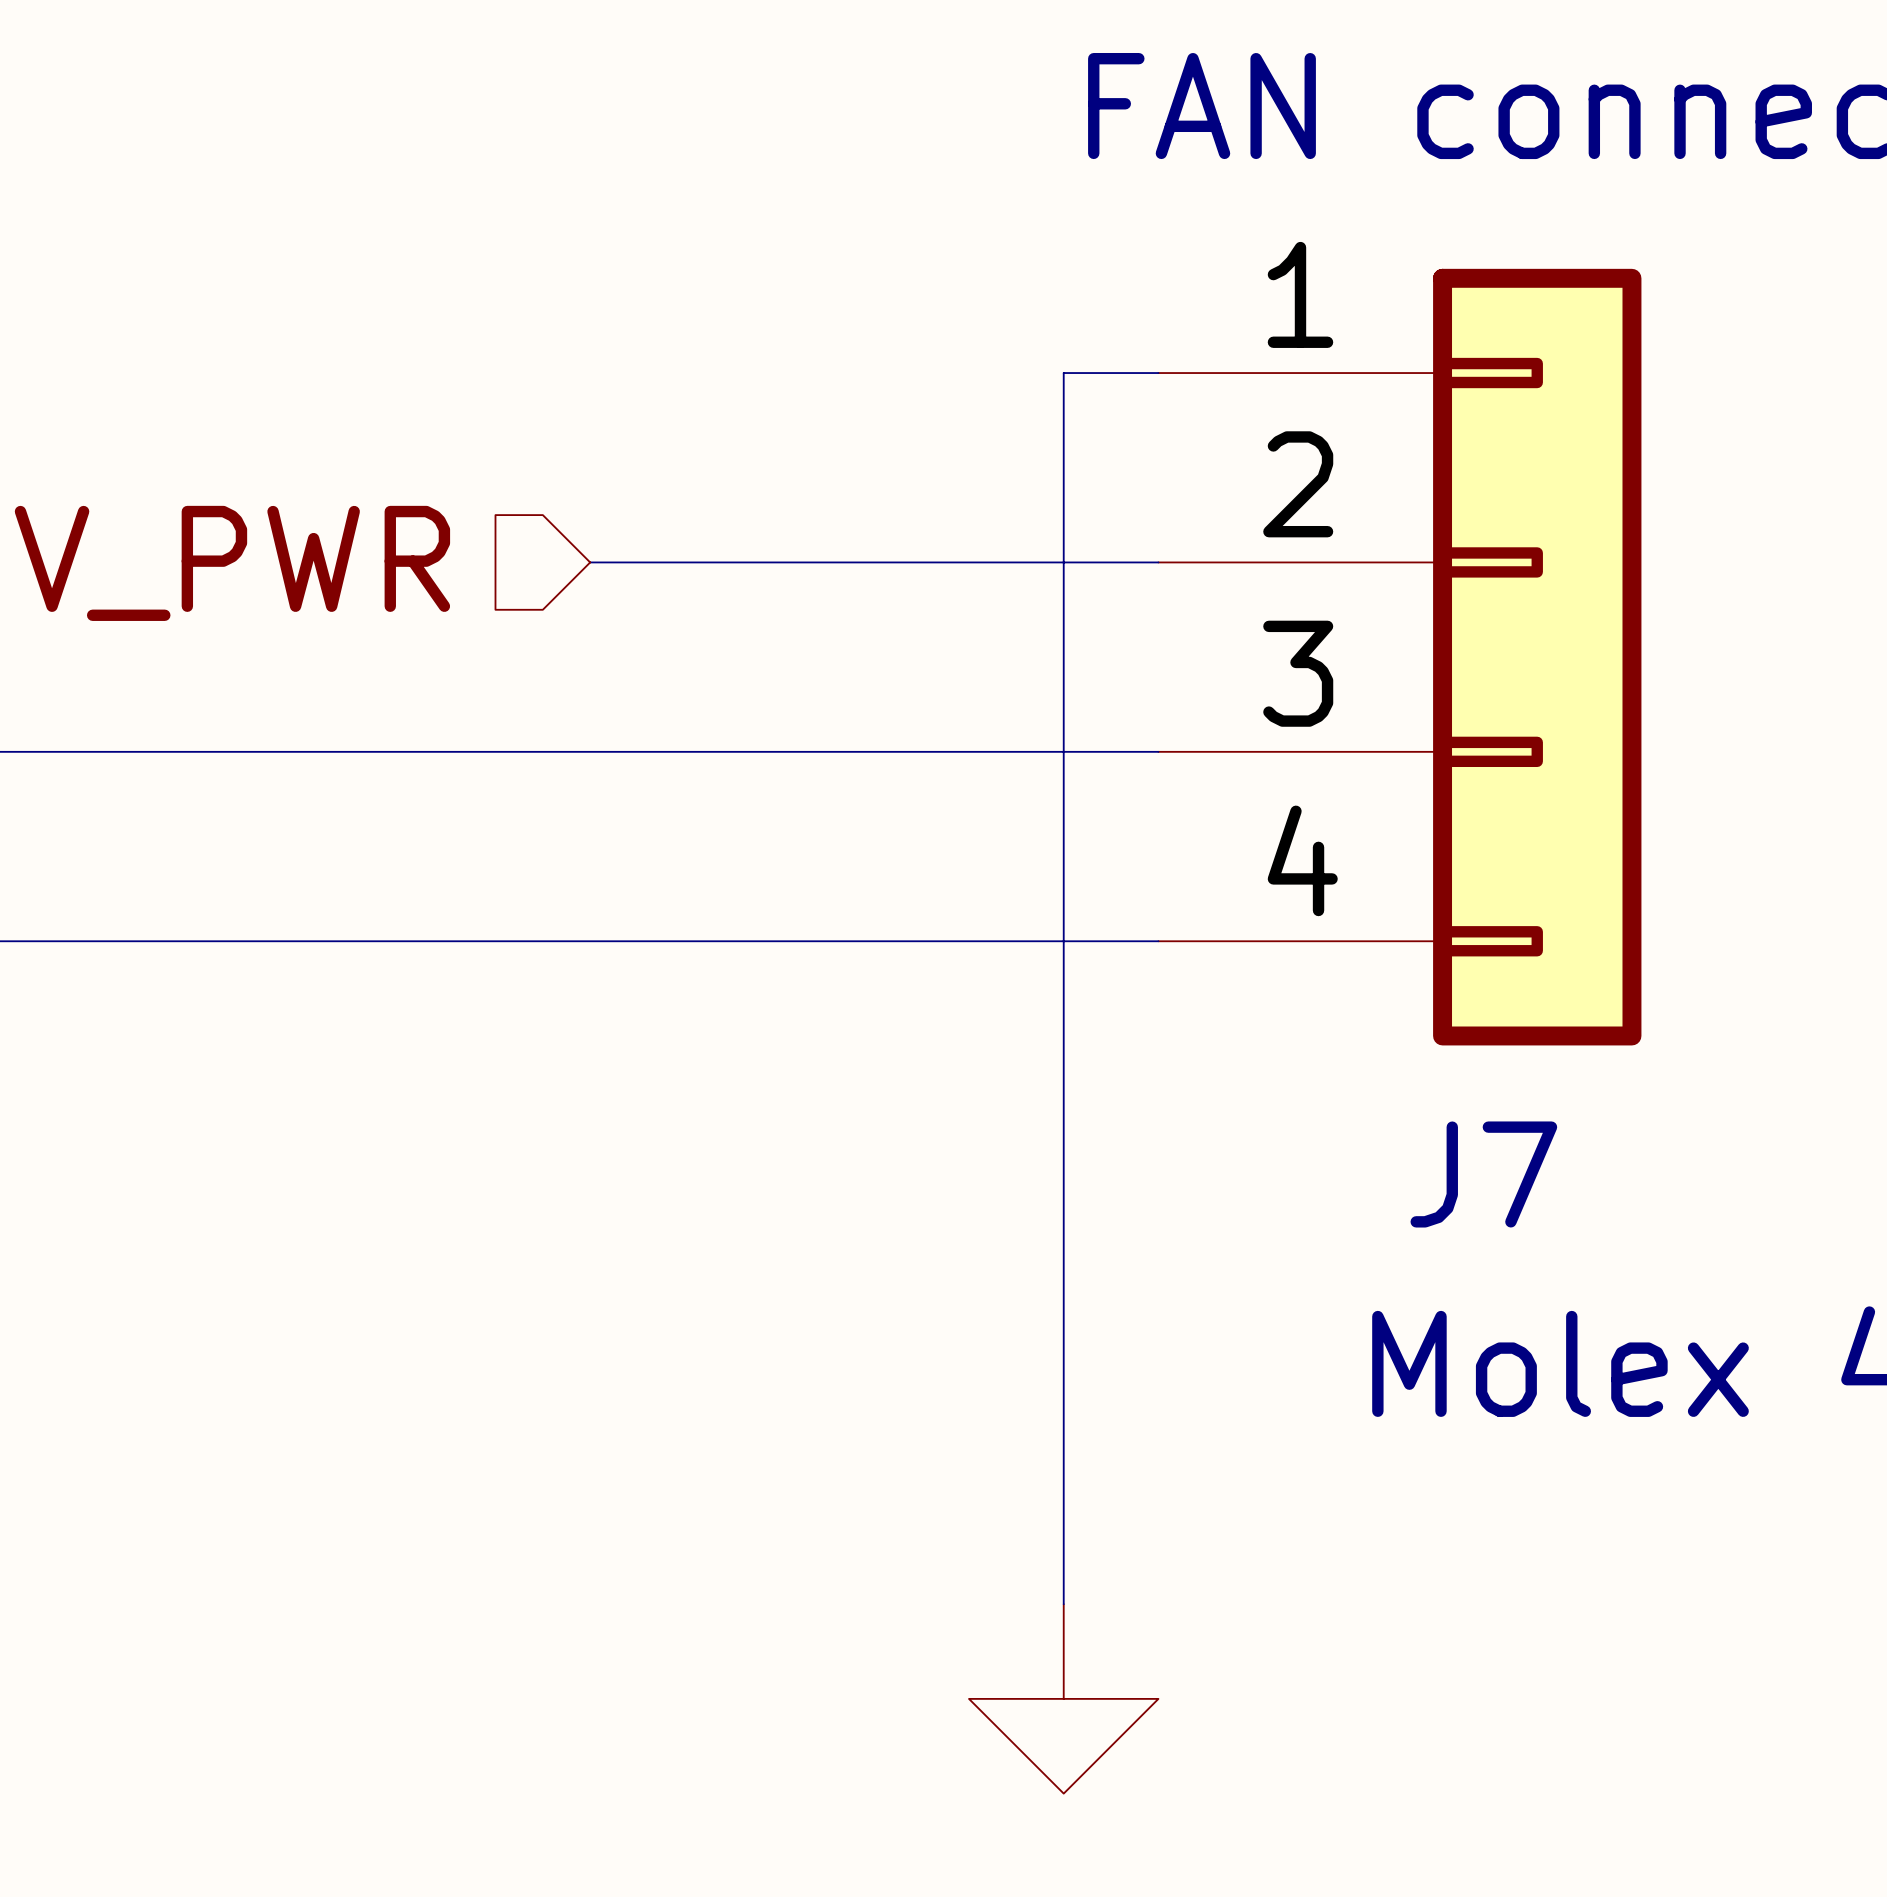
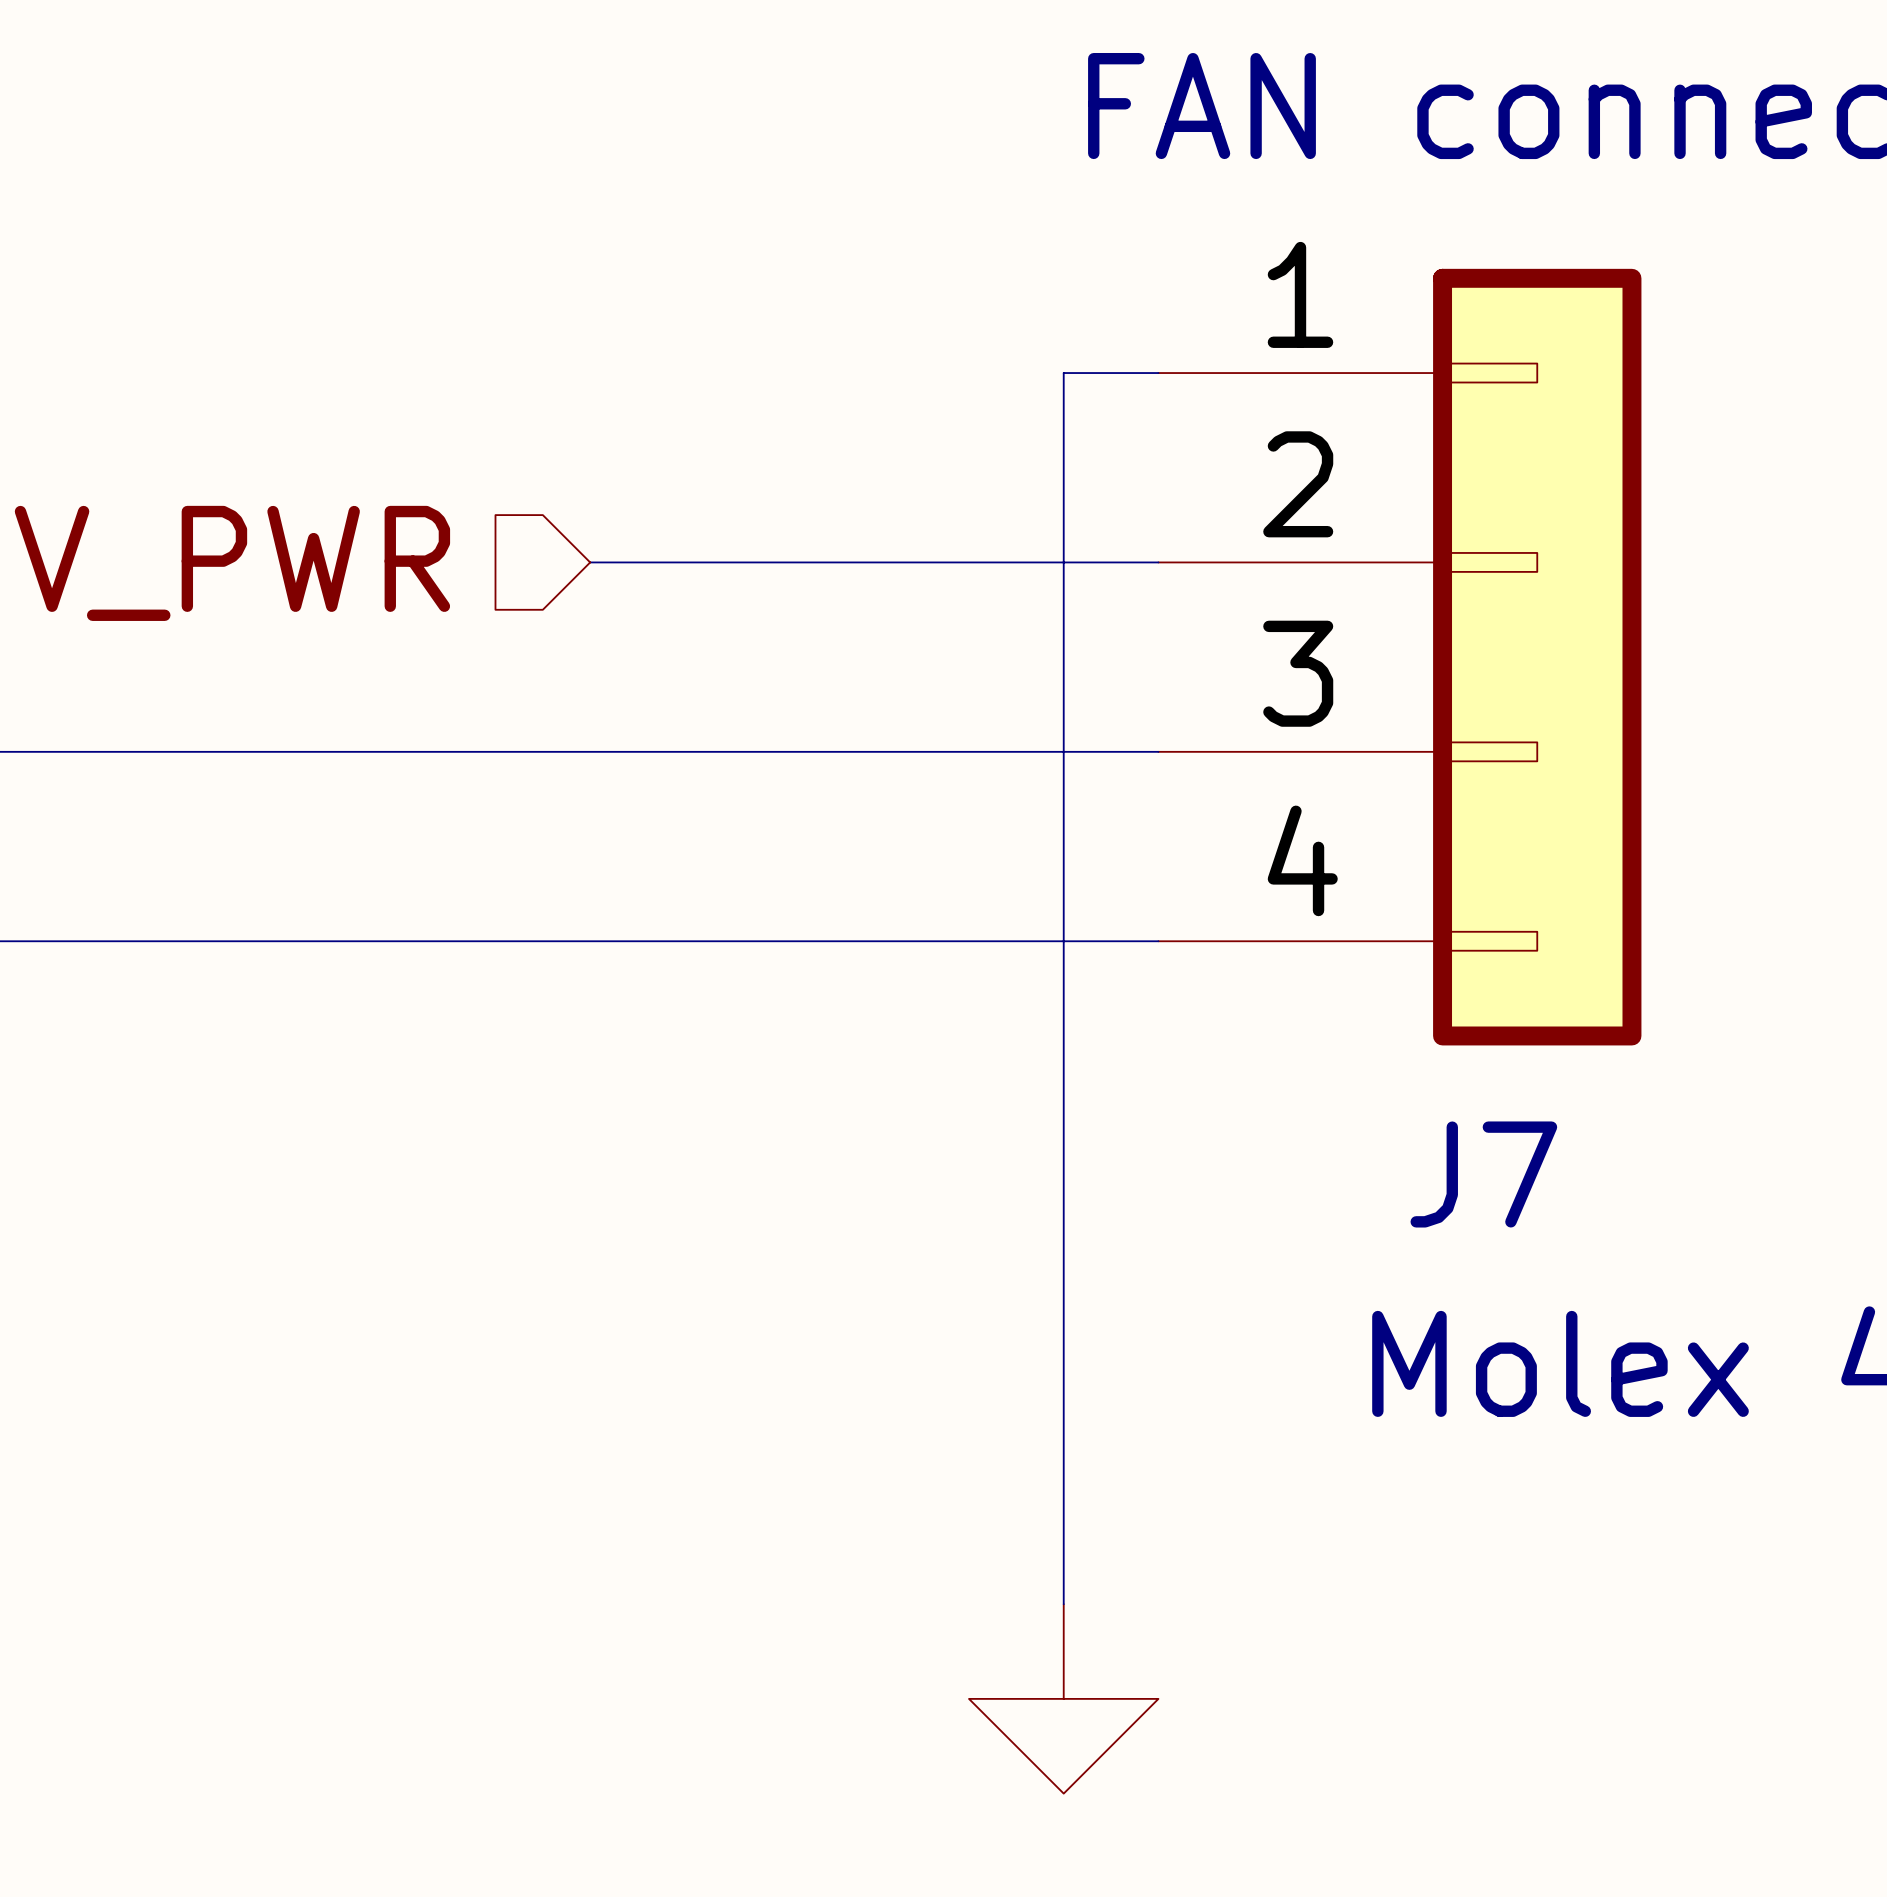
J7 symbol: [1158, 268, 1642, 1046] -> [1158, 268, 1642, 1046]

